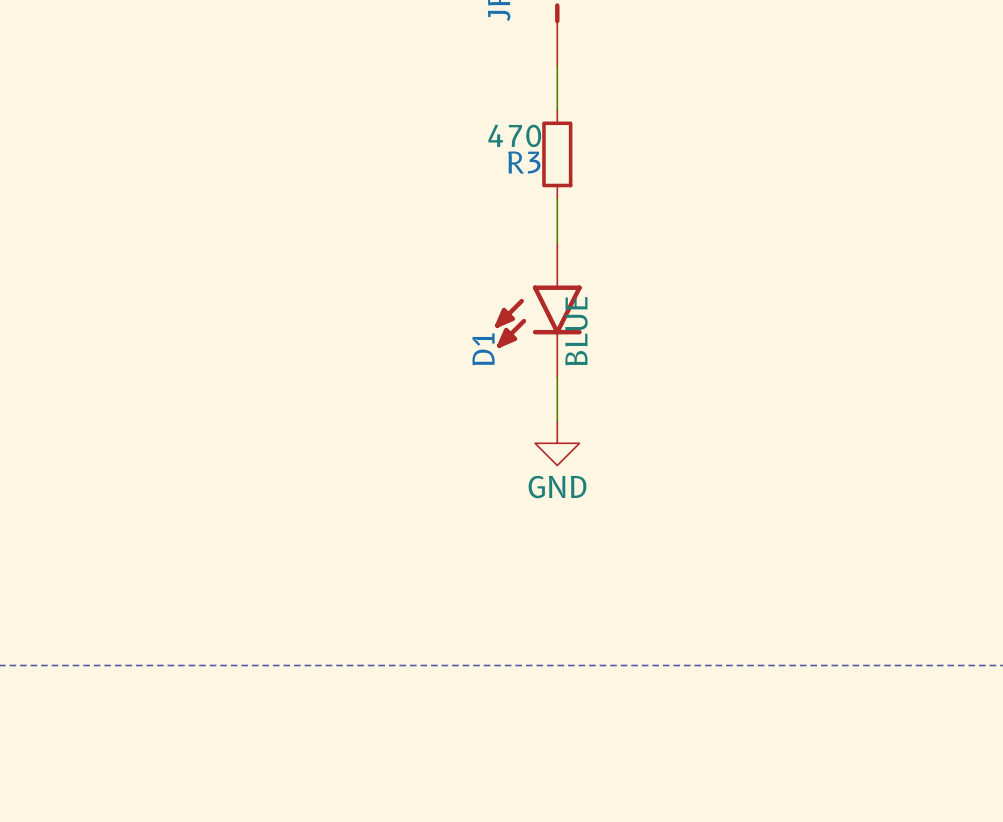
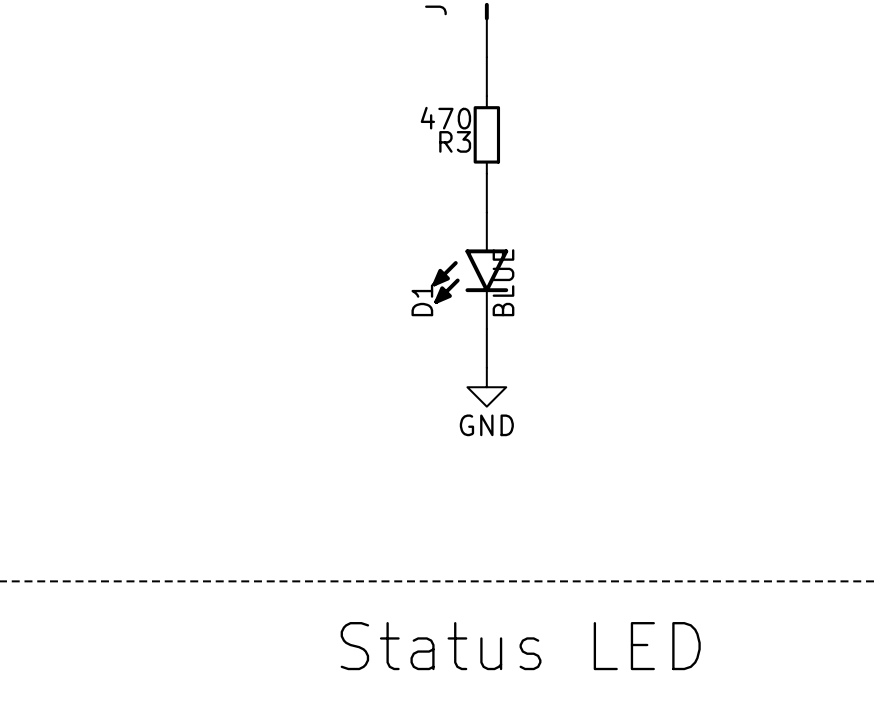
text: none -> Status LED (520, 646)

